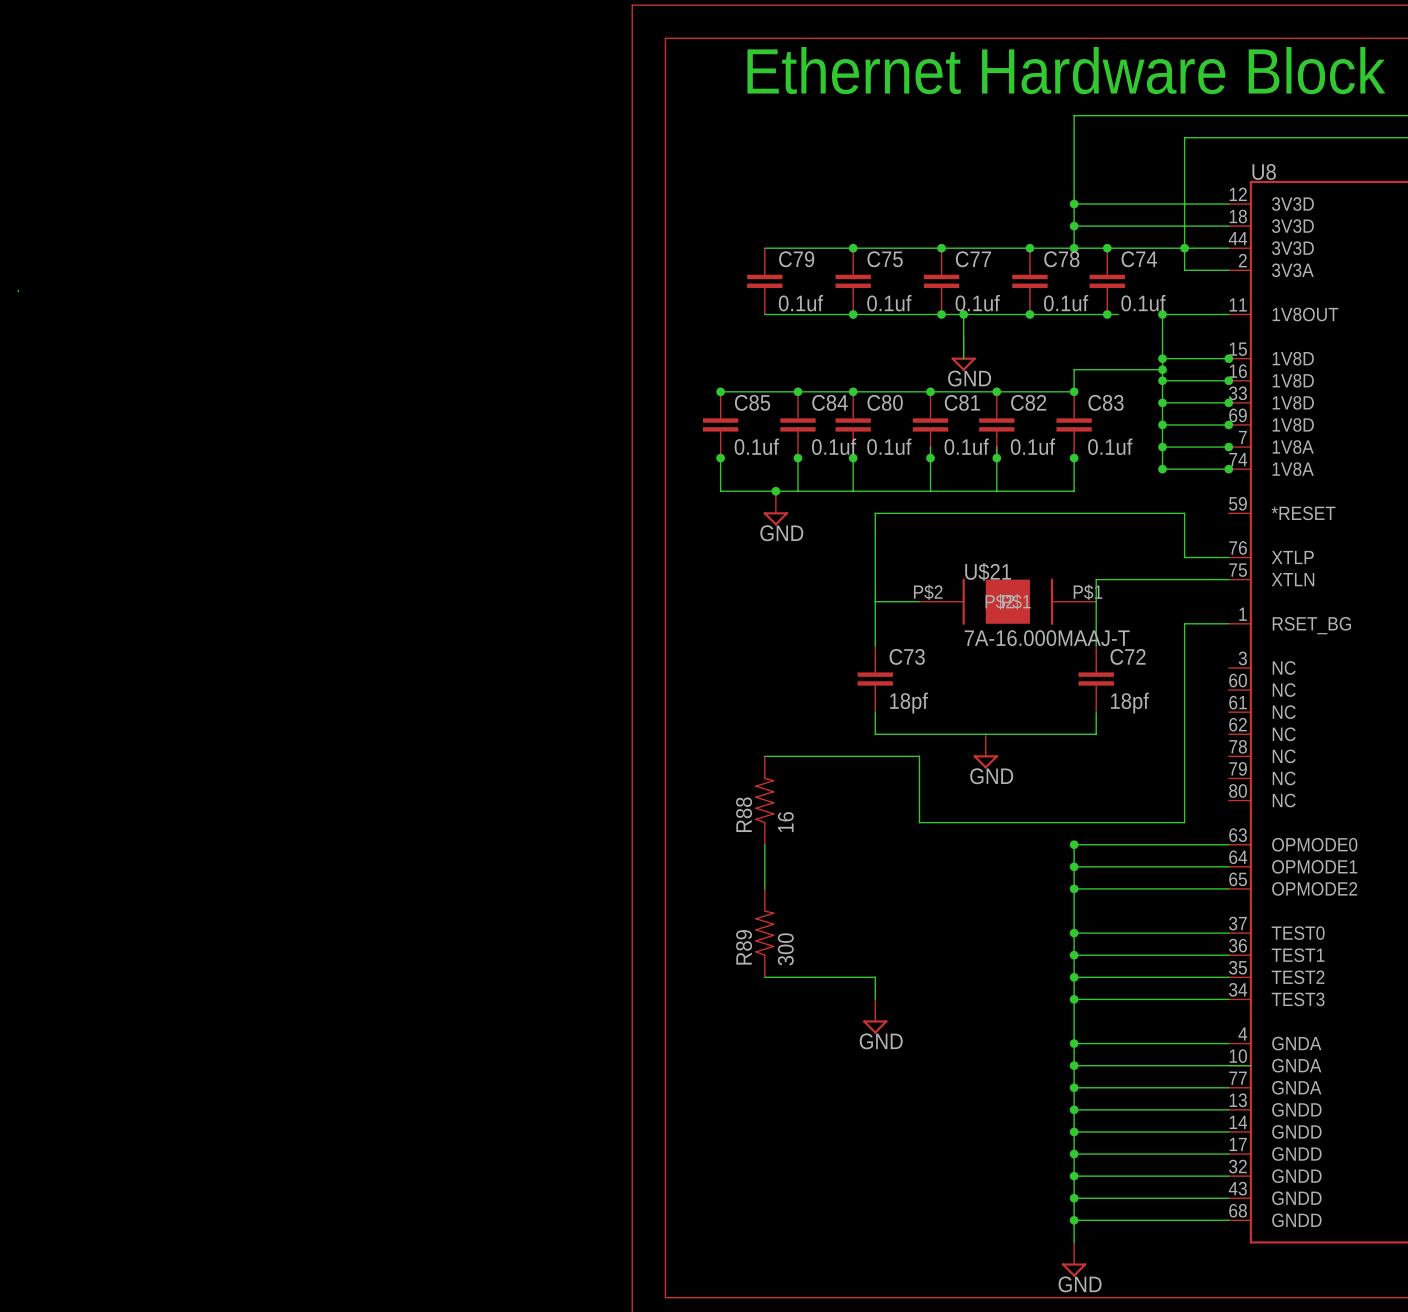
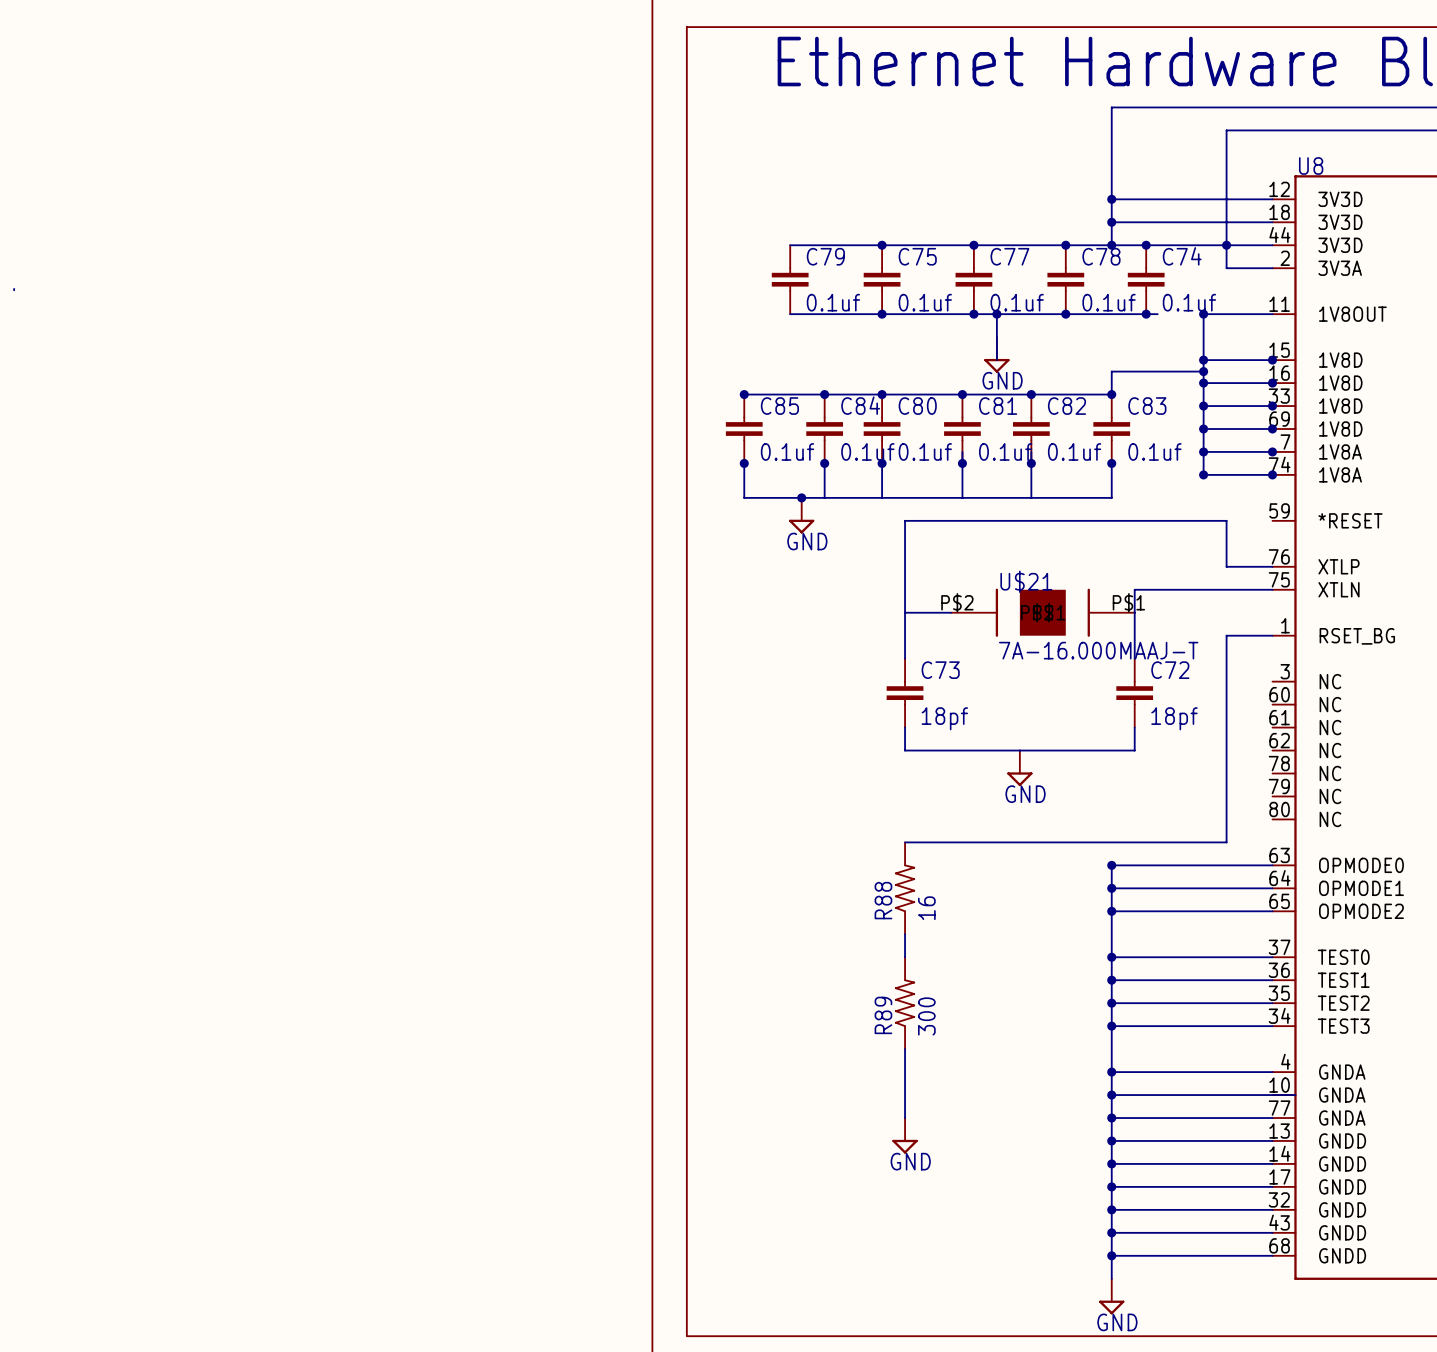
wire: (764, 756) (919, 756) (919, 822) -> (905, 842) (950, 842)
R88 position: (764, 800) -> (905, 888)
wire: (764, 844) (764, 888) -> none
wire: none -> (905, 934) (905, 957)
R89 position: (764, 933) -> (905, 1003)
wire: (764, 977) (875, 977) (875, 999) -> none
power symbol position: GND (875, 1016) -> GND (905, 1135)
wire: none -> (905, 1049) (905, 1118)

